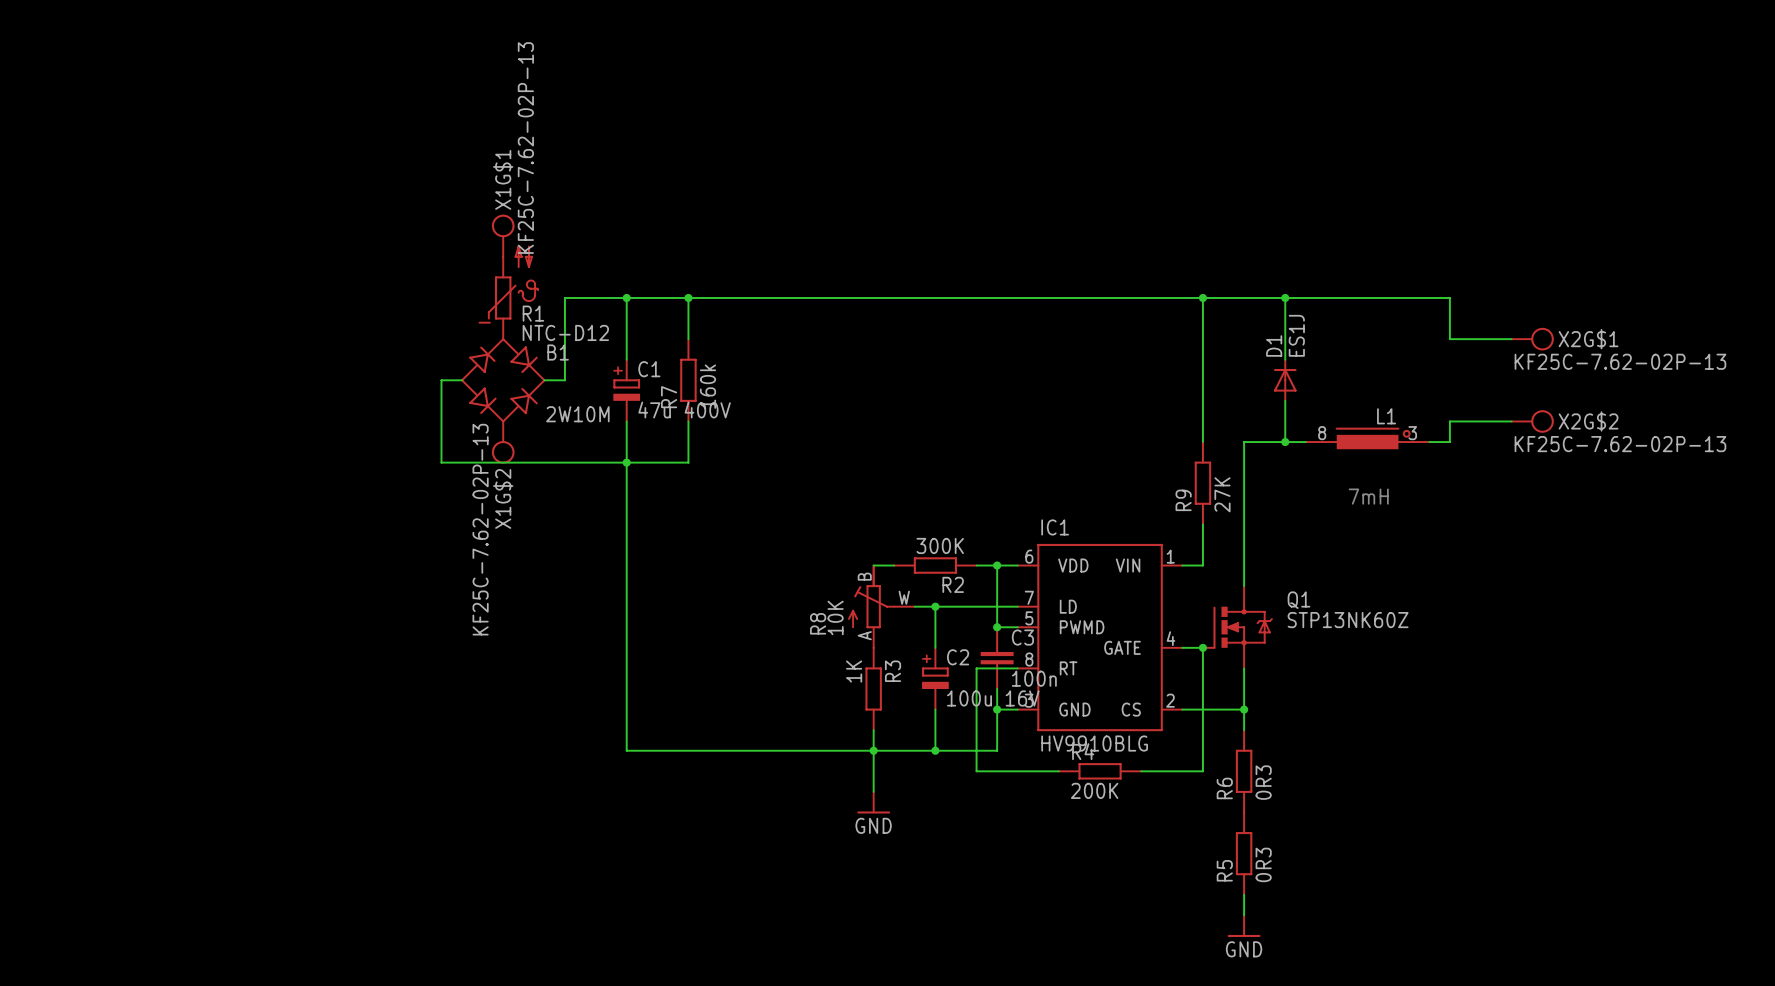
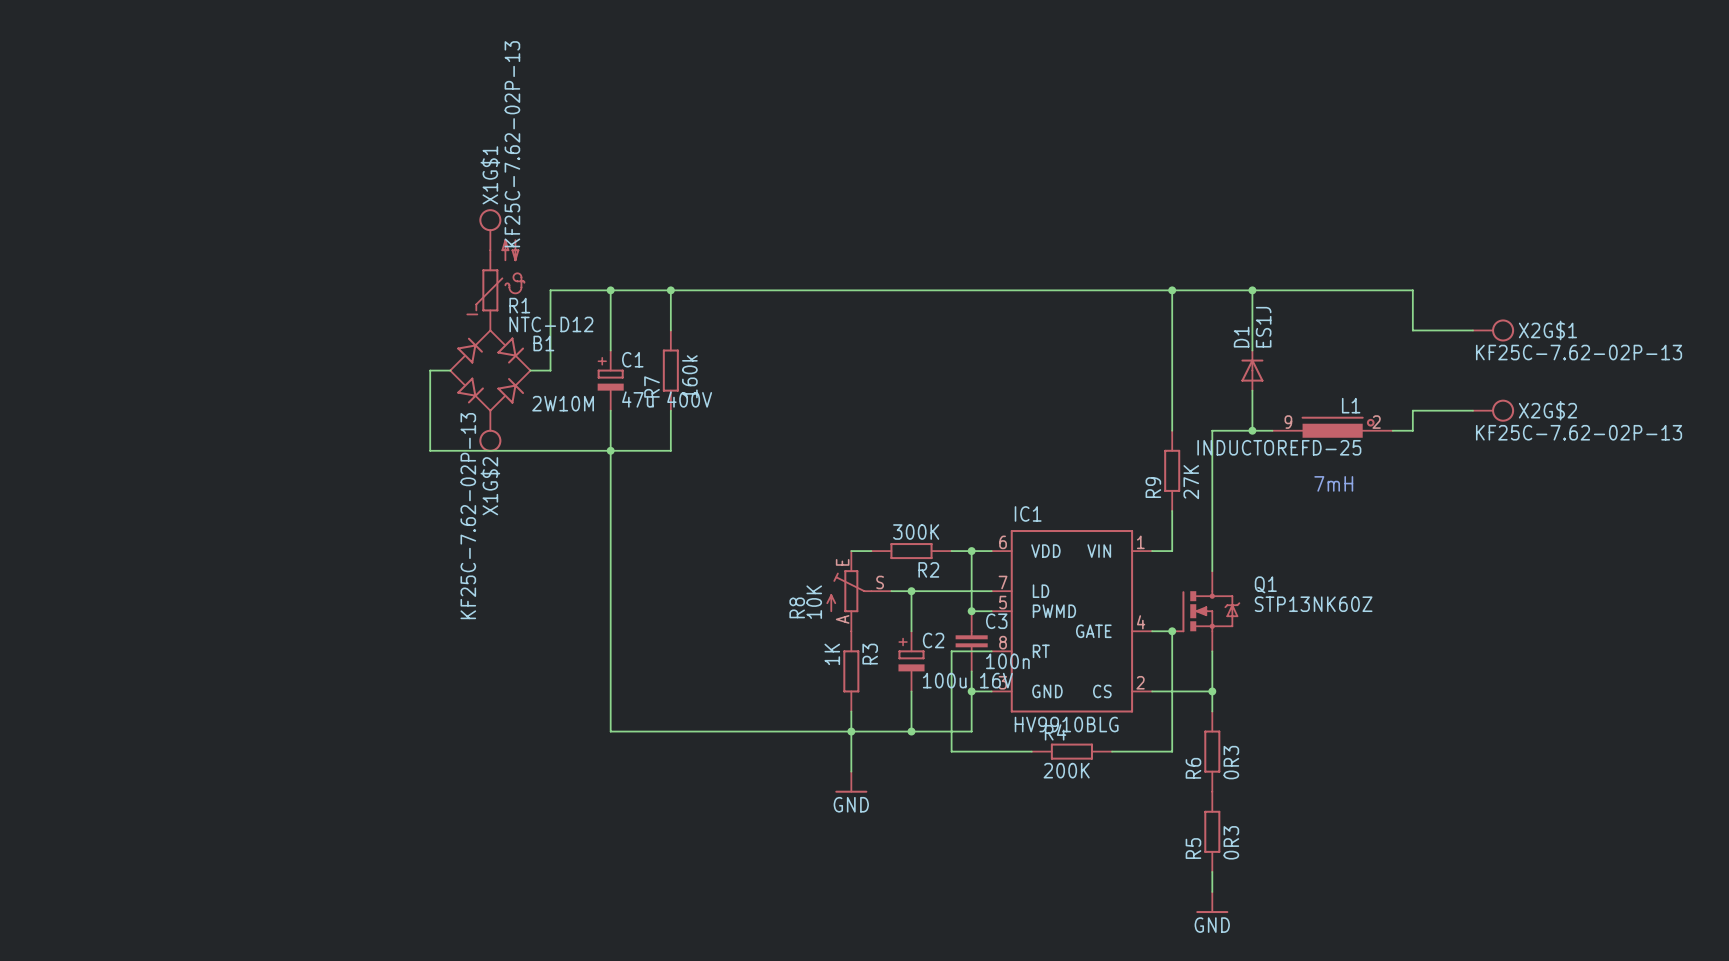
L1 pin number: 8 (1322, 433) -> 9 (1288, 422)
L1 pin number: 3 (1412, 433) -> 2 (1376, 422)
L1 value: none -> INDUCTOREFD-25 (1279, 447)
R8 symbol: [848, 564, 915, 648] -> [826, 551, 892, 632]

